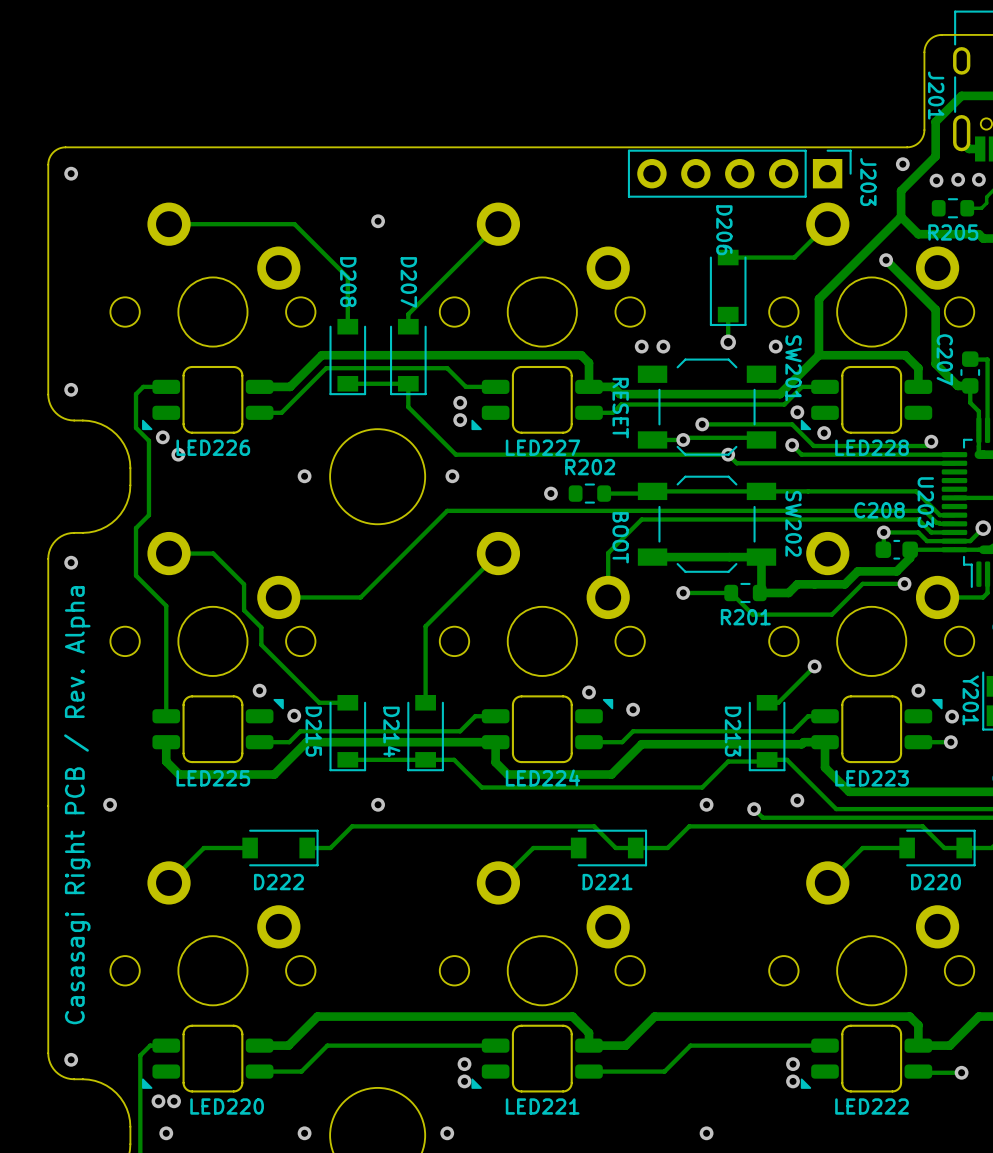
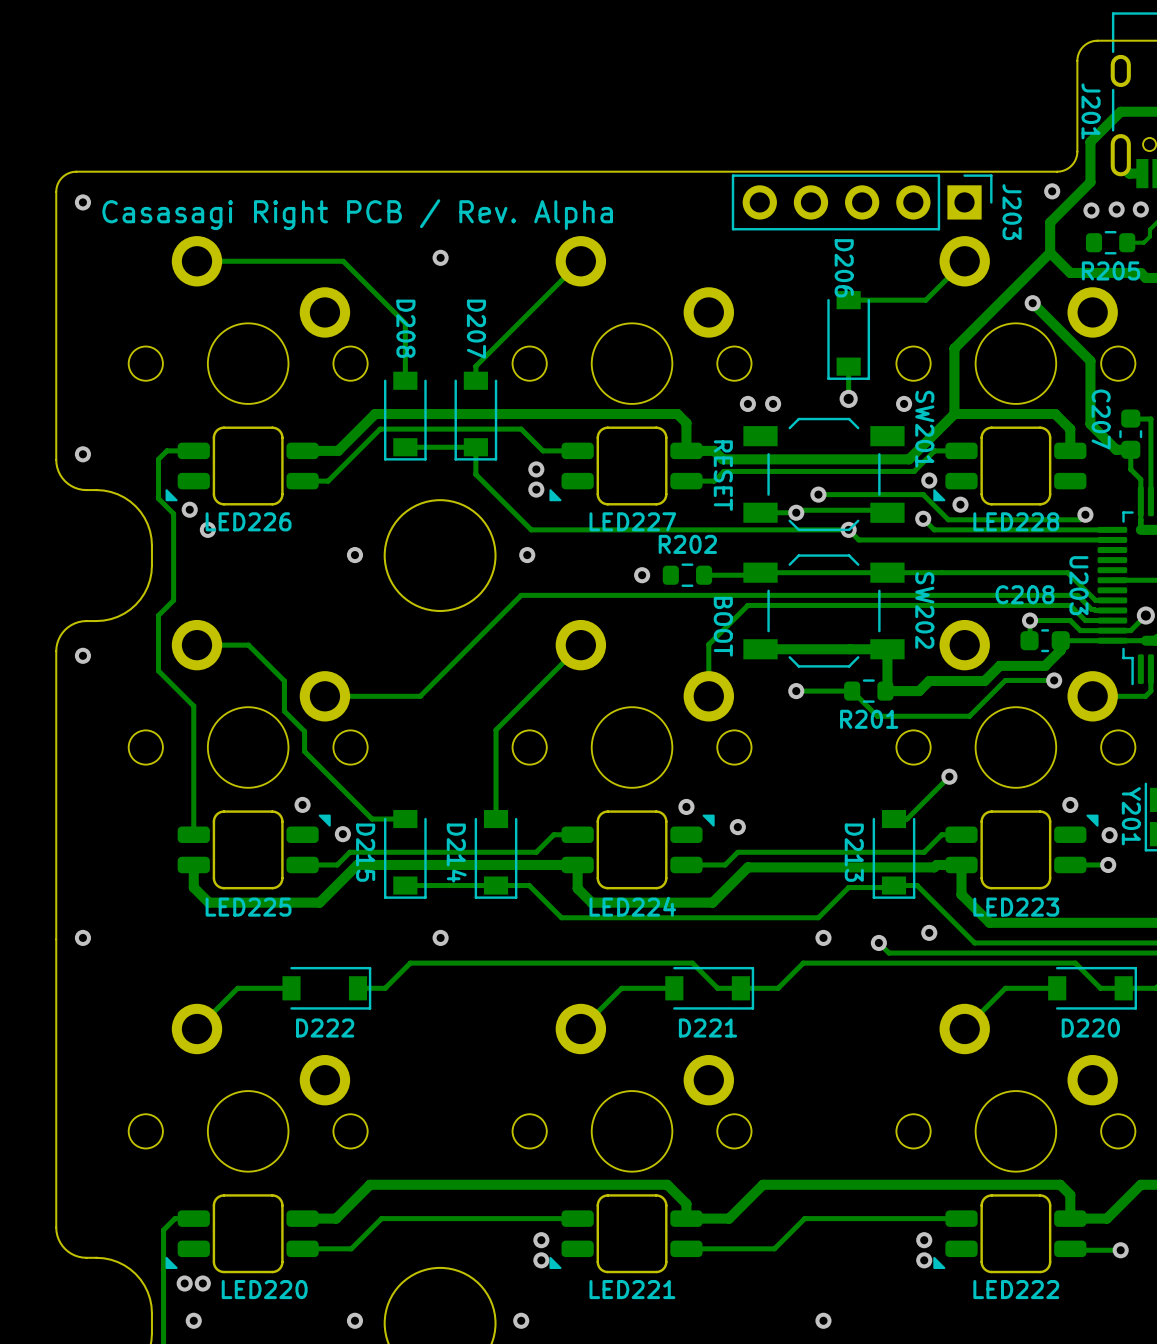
text: none -> Casasagi Right PCB / Rev. Alpha (357, 214)
via position: (110, 804) -> (82, 937)
text: Casasagi Right PCB / Rev. Alpha (77, 805) -> none
via: (71, 1059) -> none

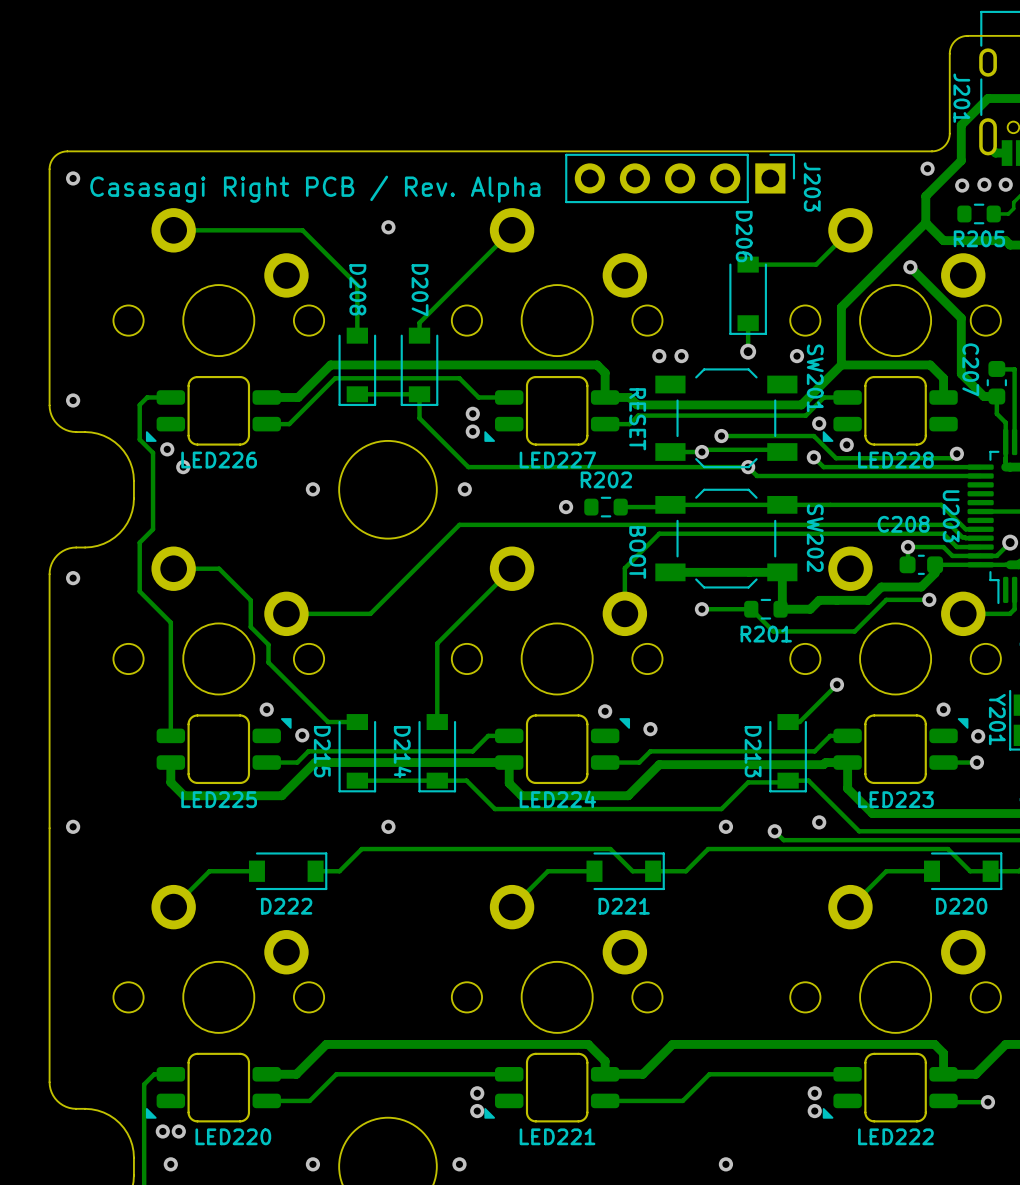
J203 position: (862, 202) -> (680, 178)

